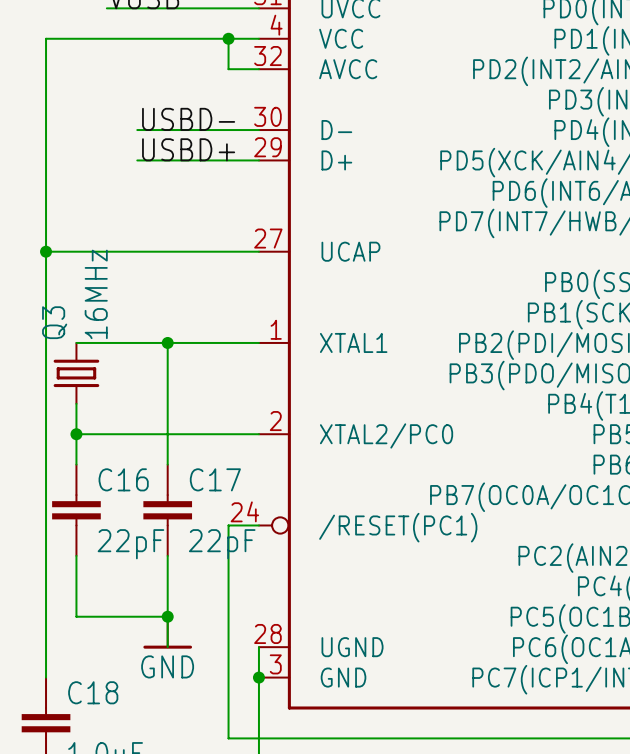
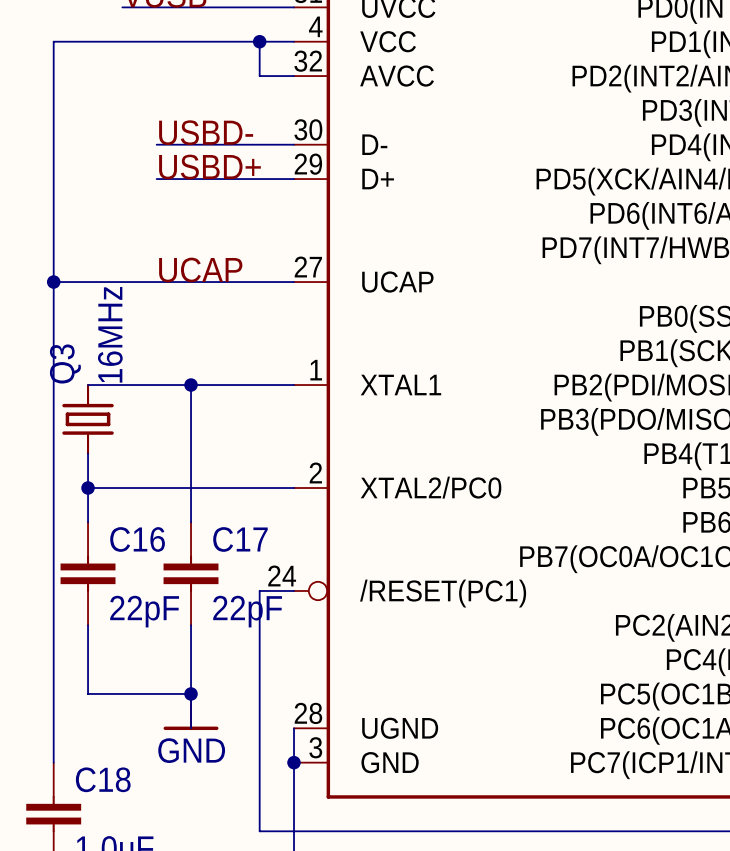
label: none -> UCAP (200, 270)

